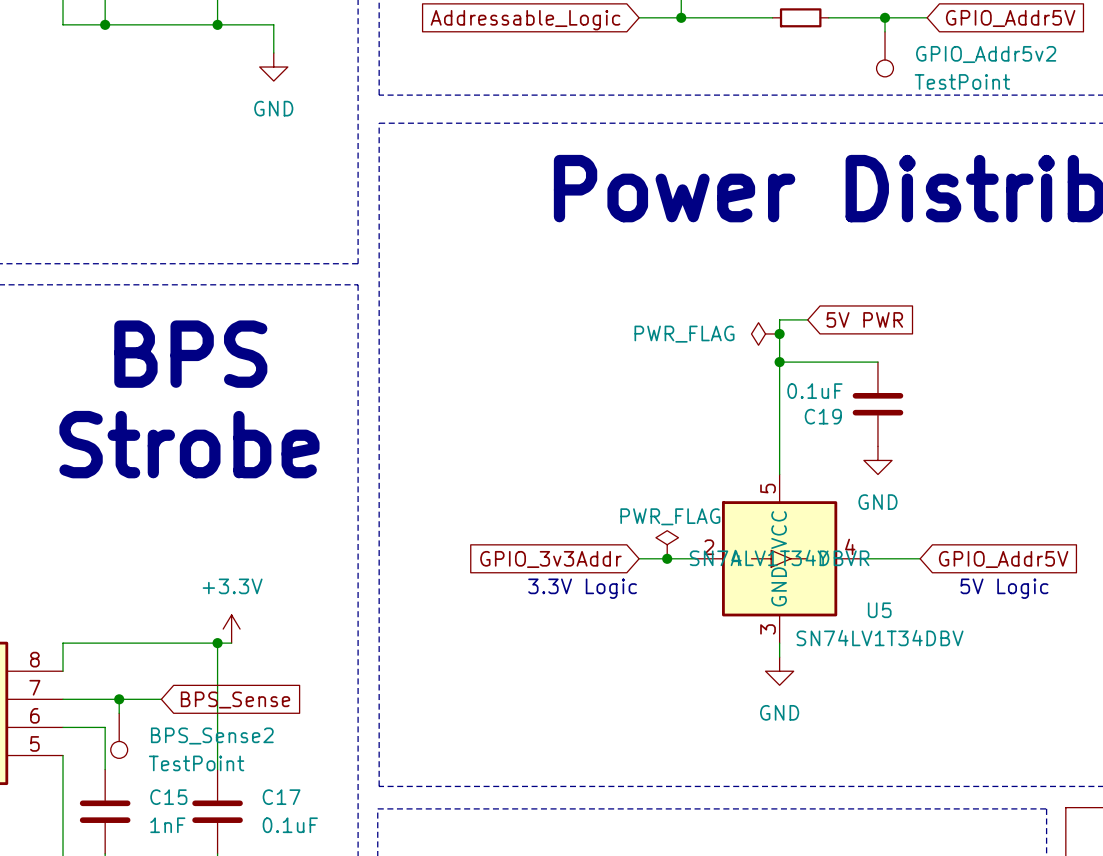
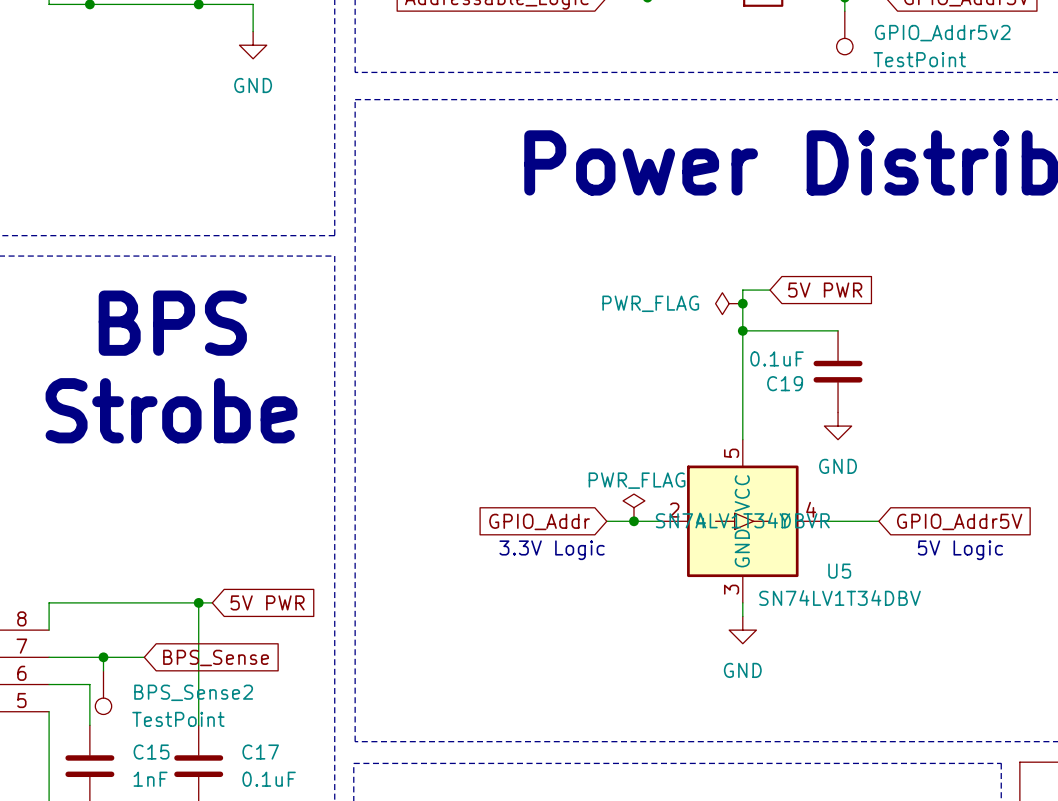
global label: GPIO_3v3Addr (550, 559) -> GPIO_Addr (539, 521)
power symbol: +3.3V (231, 629) -> none
global label: none -> 5V PWR (267, 602)

